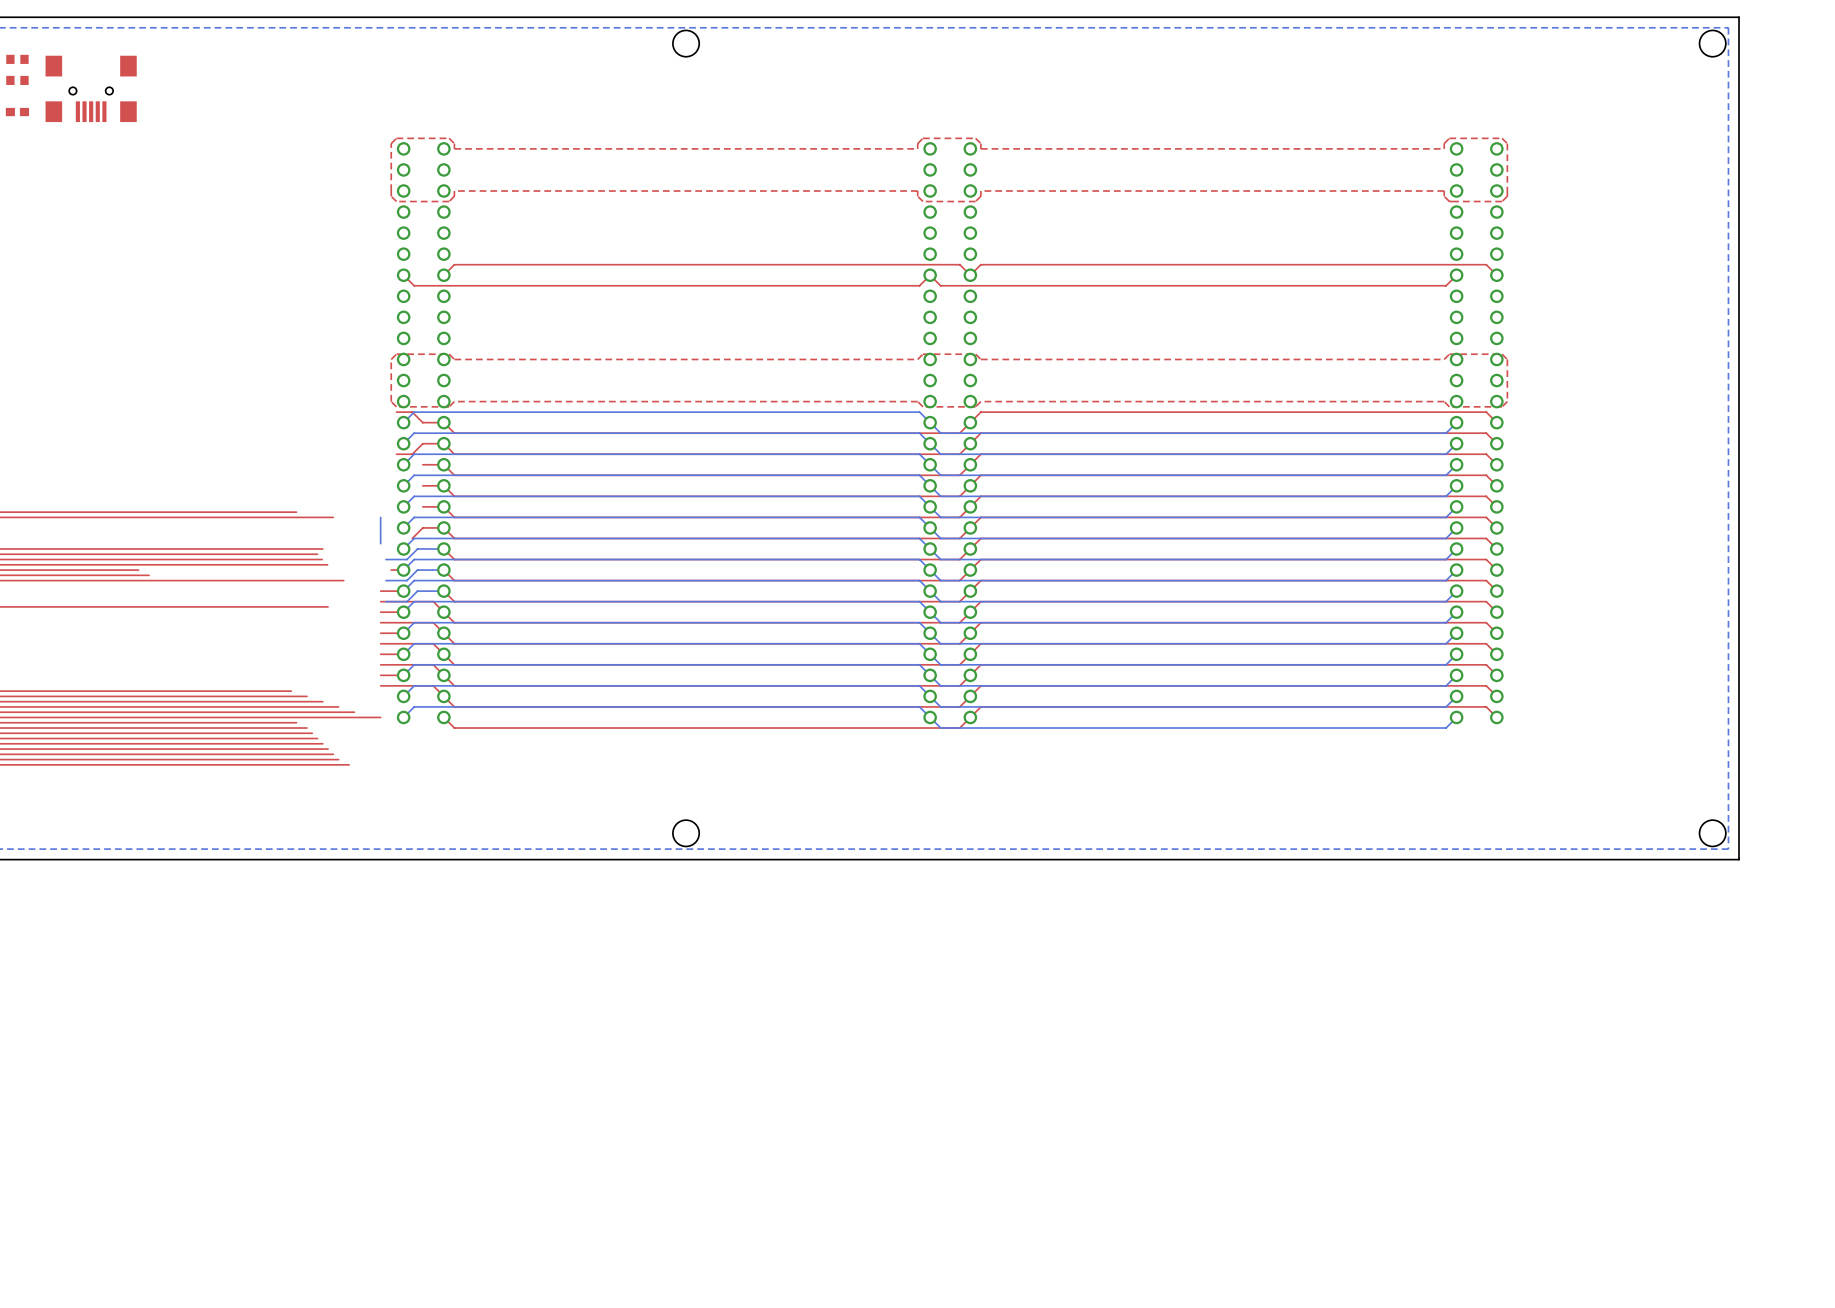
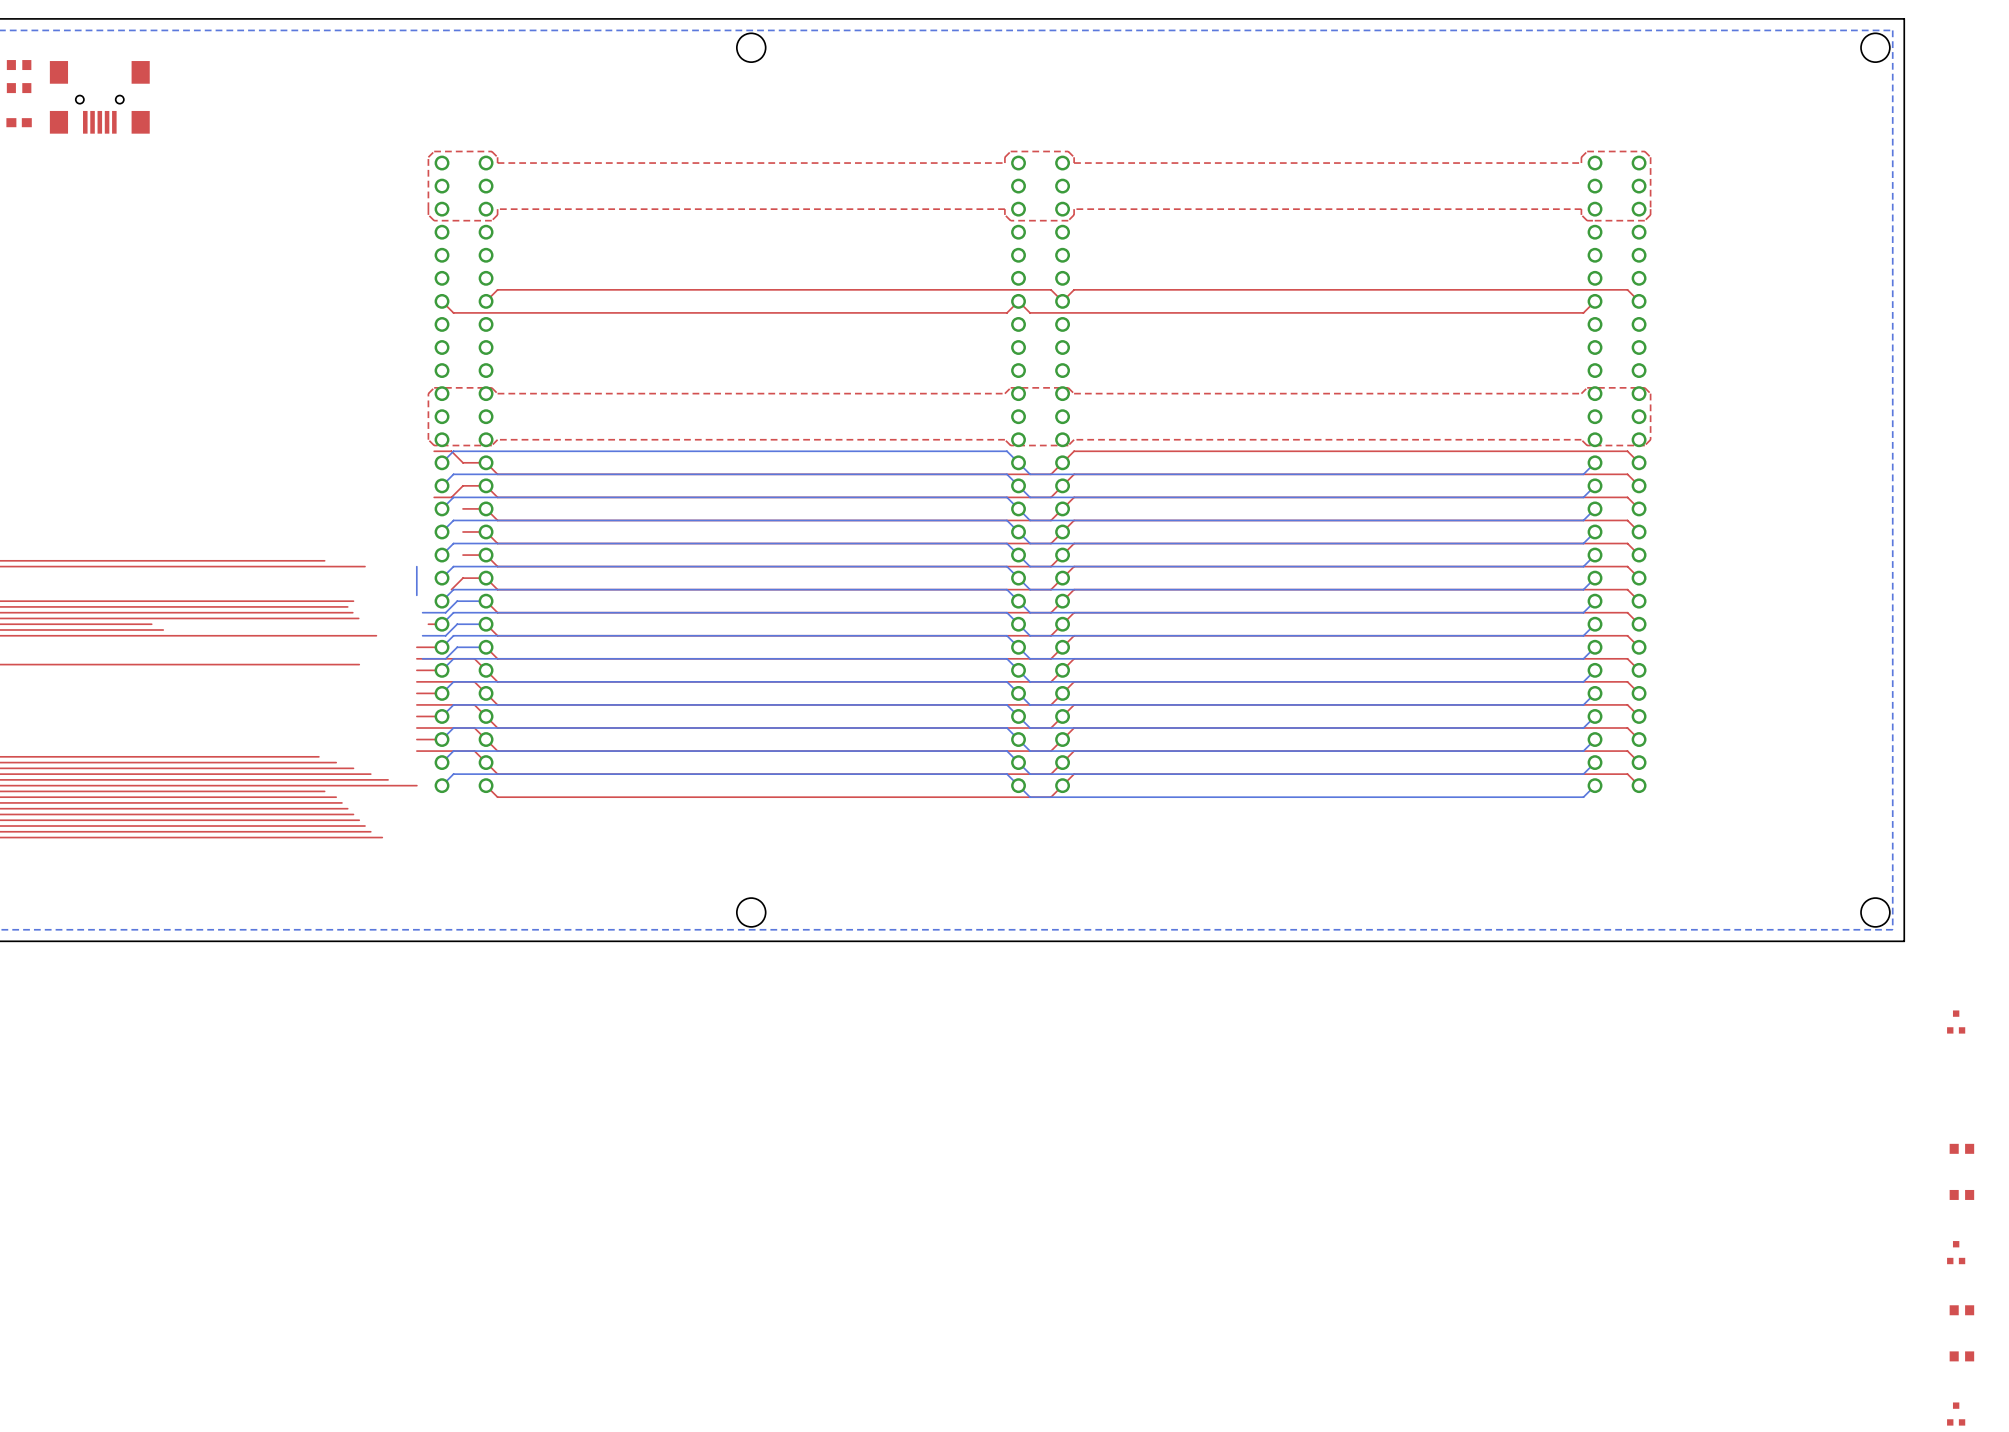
part: none -> (1956, 1022)
part: none -> (1961, 1148)
part: none -> (1961, 1194)
part: none -> (1956, 1252)
part: none -> (1961, 1310)
part: none -> (1961, 1356)
part: none -> (1956, 1414)

